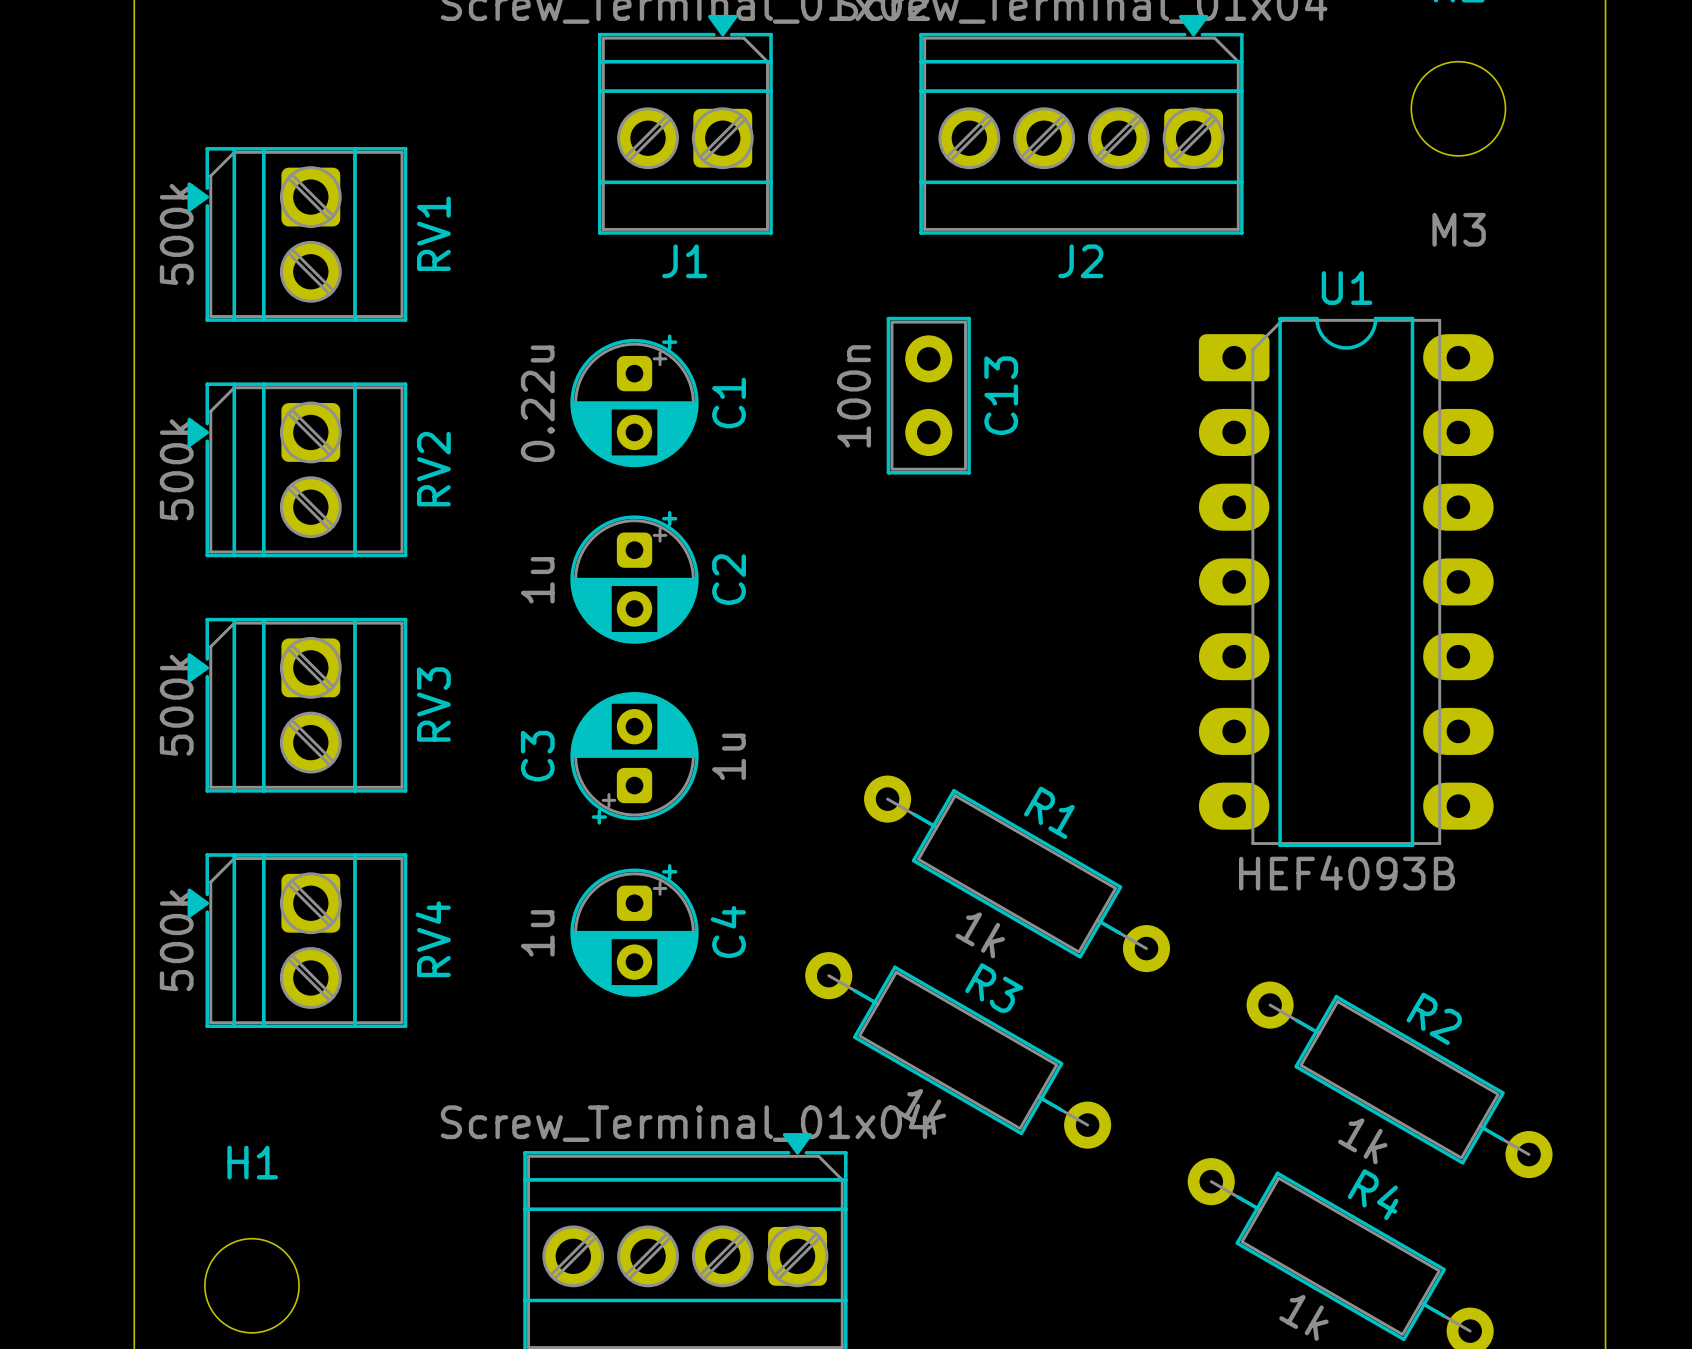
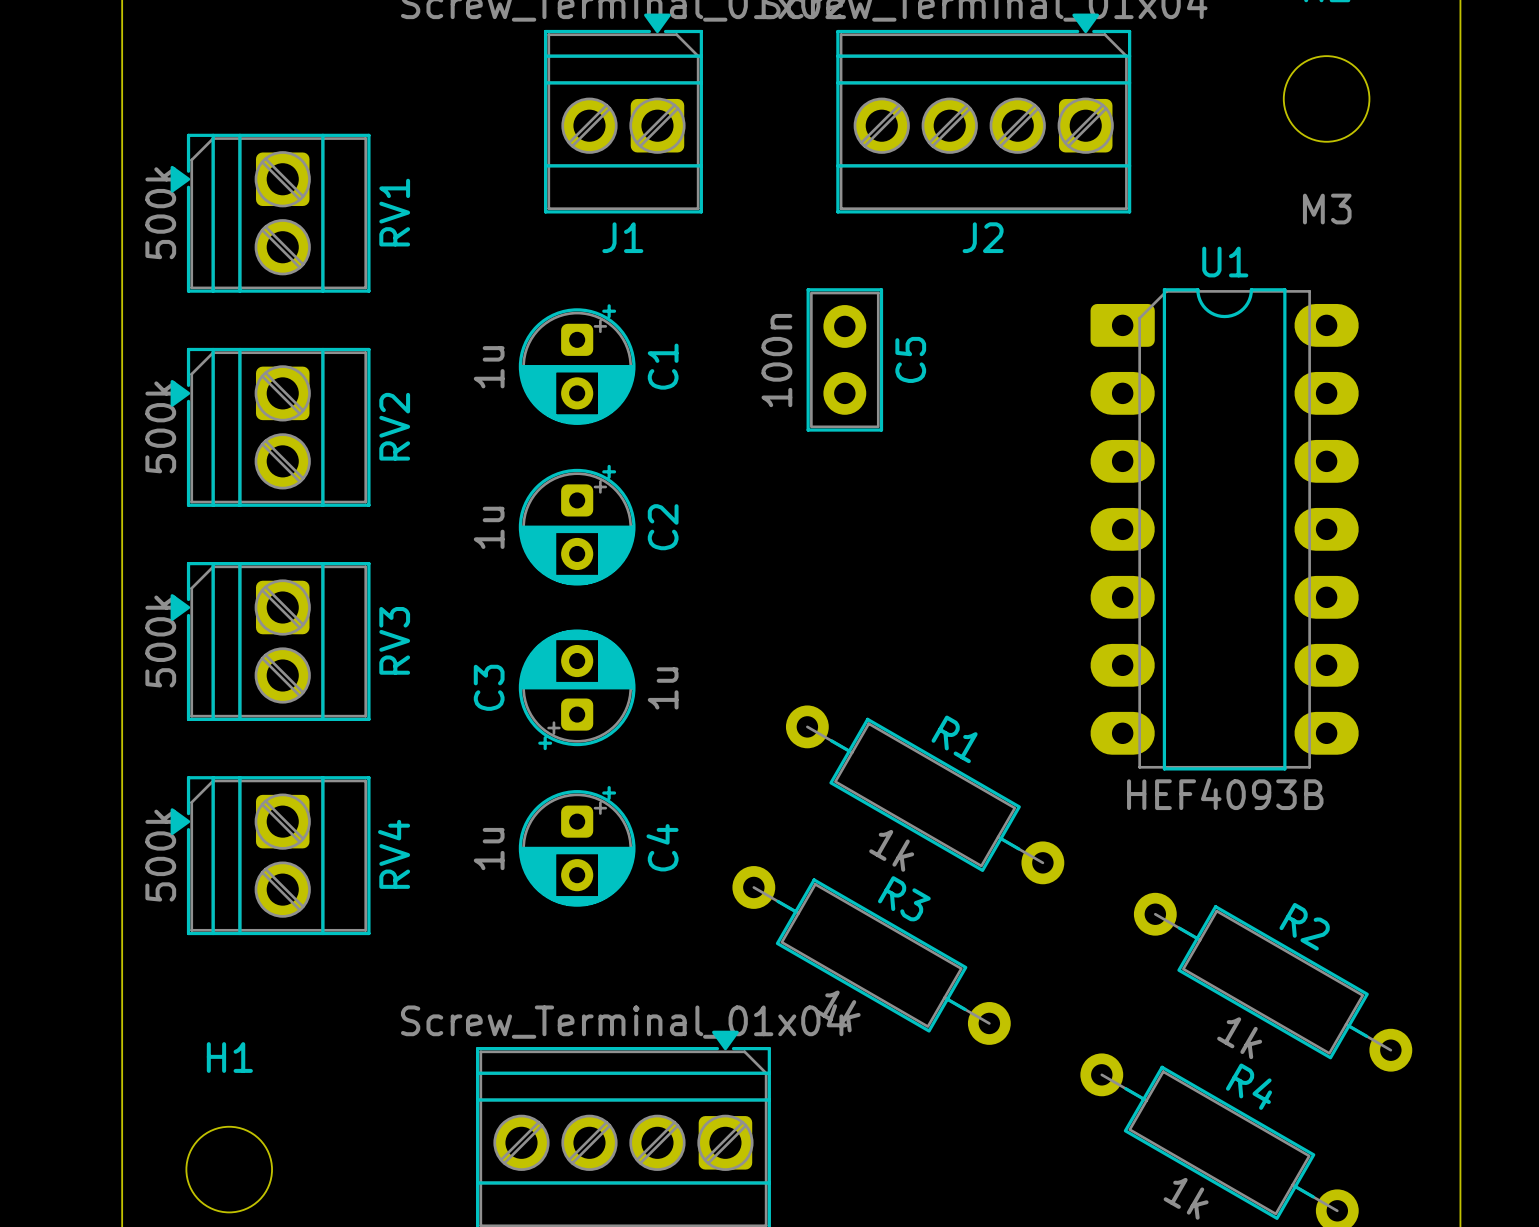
C13 name: C13 (1001, 395) -> C5 (910, 359)
C1 value: 0.22u (537, 403) -> 1u (489, 367)

